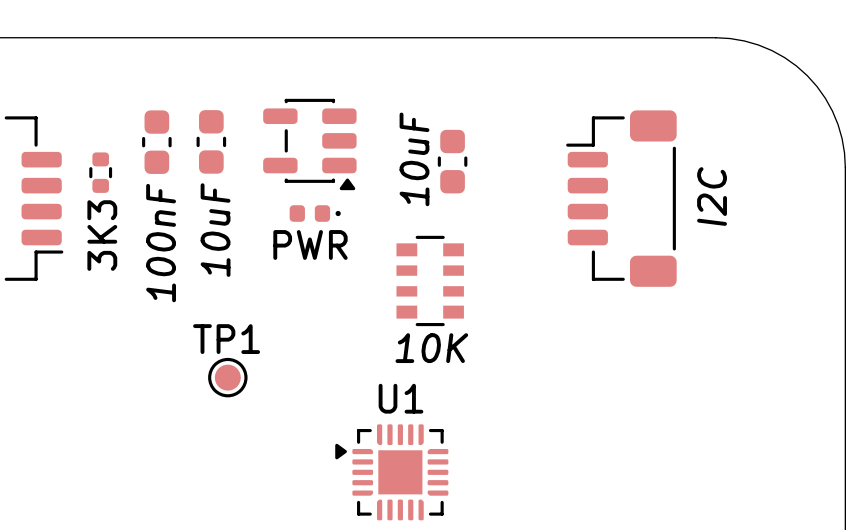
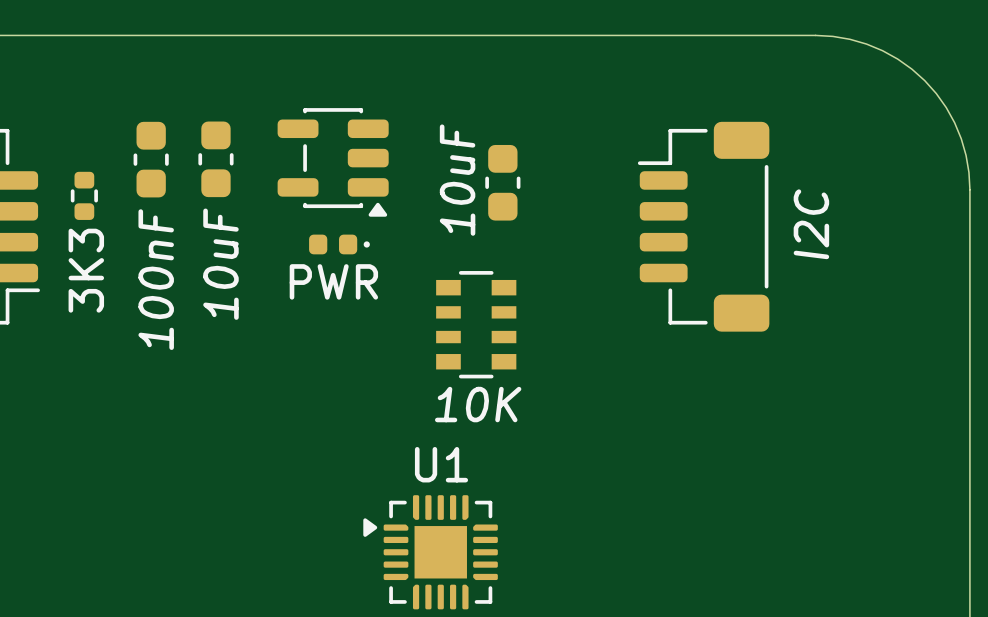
TP1: (227, 377) -> none

